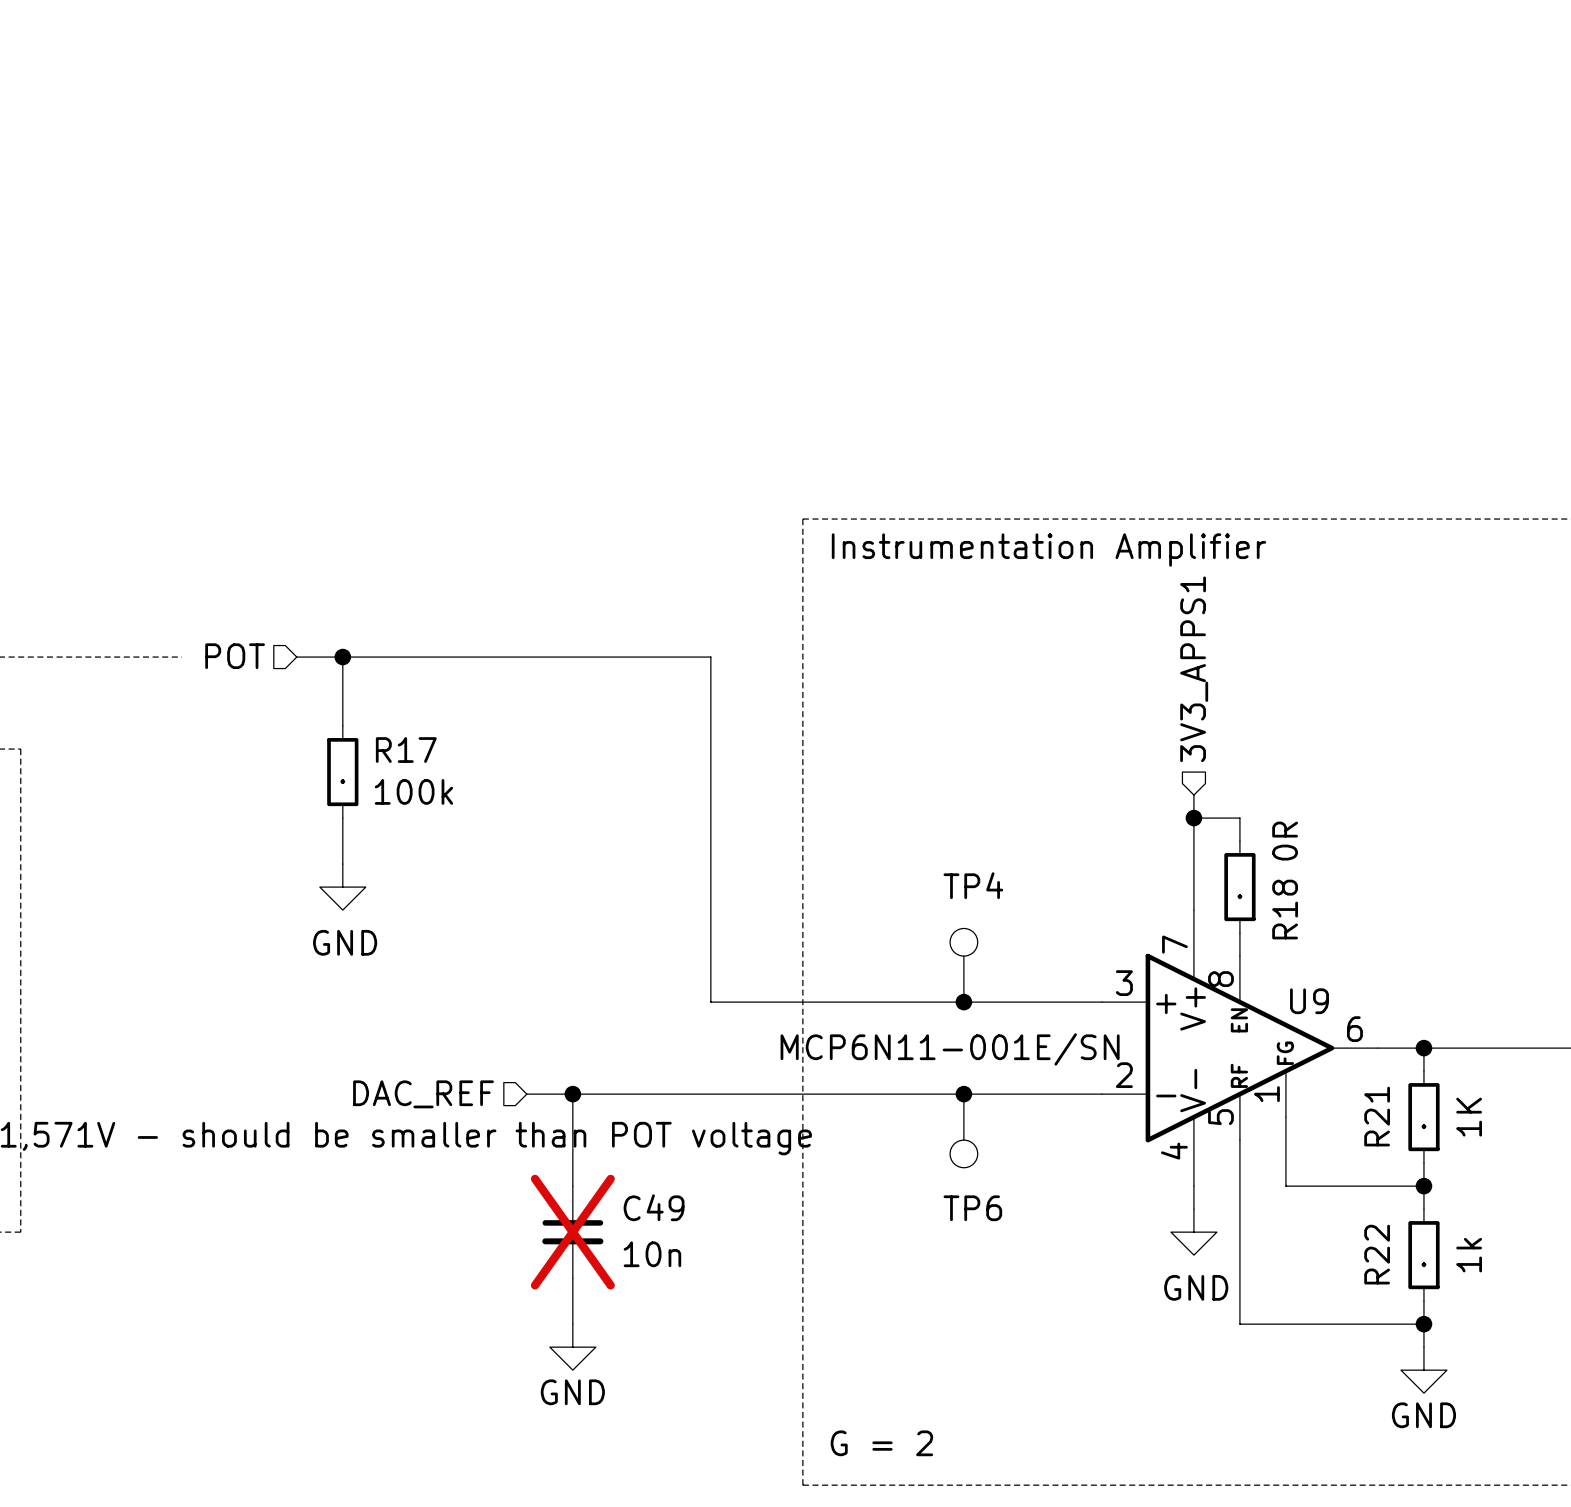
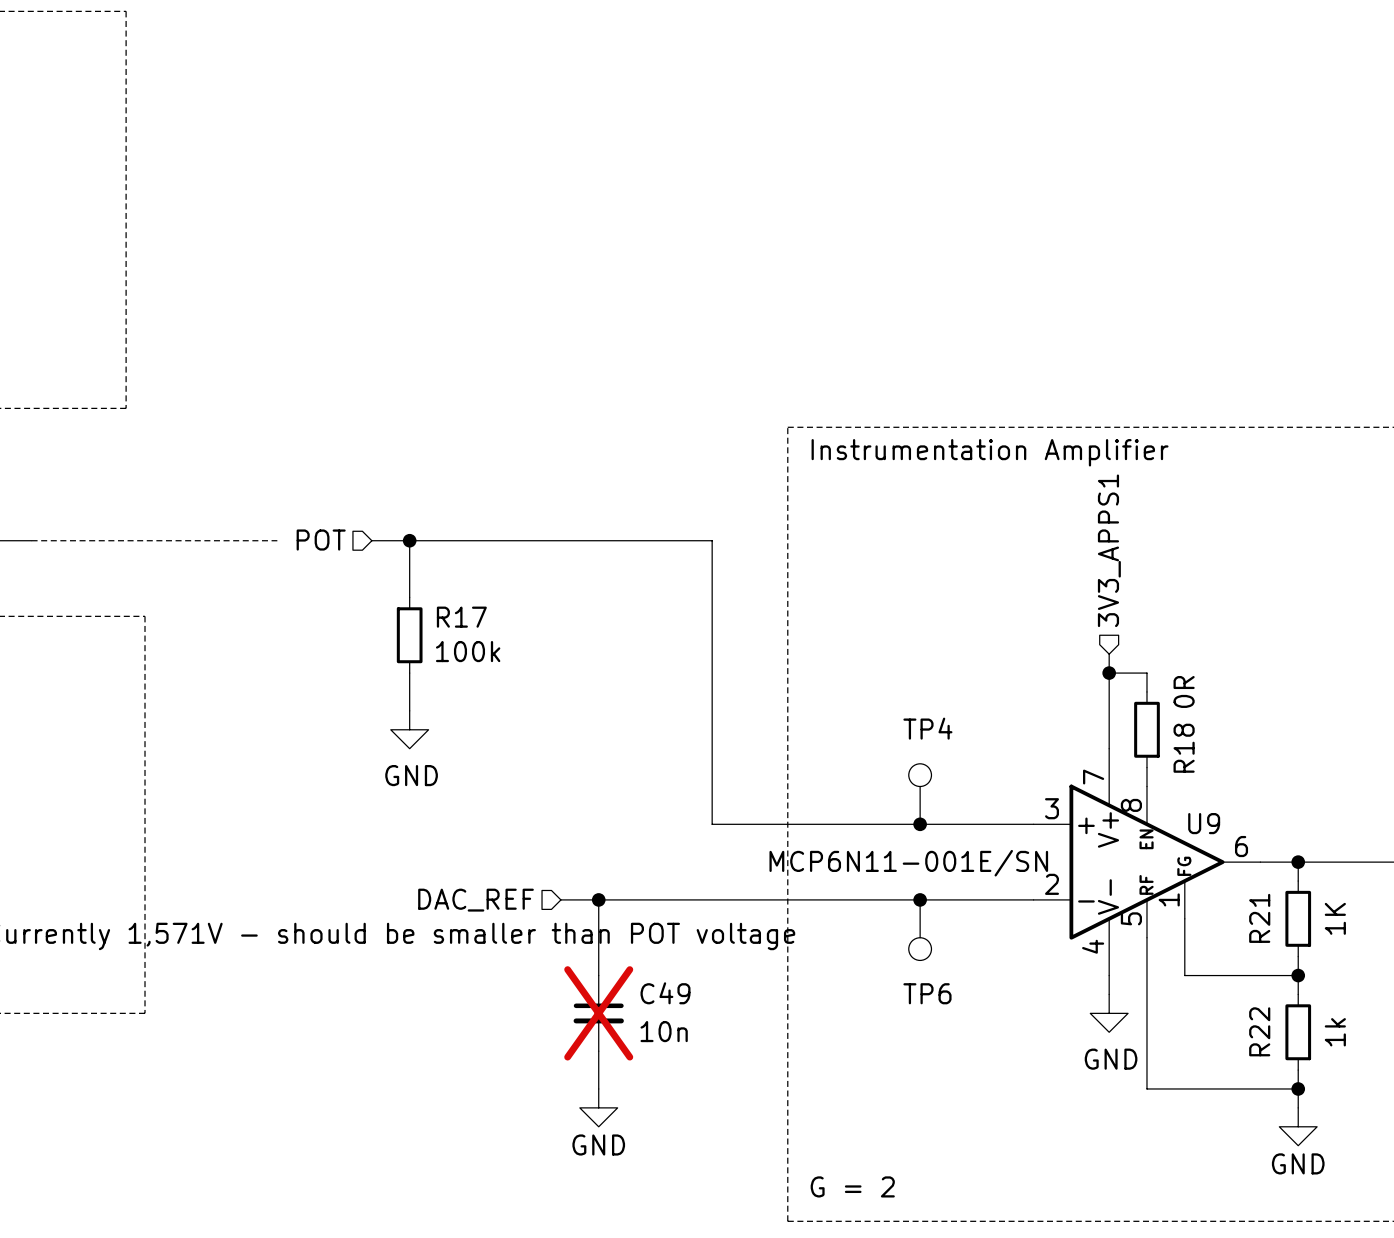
R17 text: . (342, 781) -> none
R18 text: . (1239, 896) -> none
R21 text: . (1423, 1126) -> none
R22 text: . (1423, 1264) -> none

